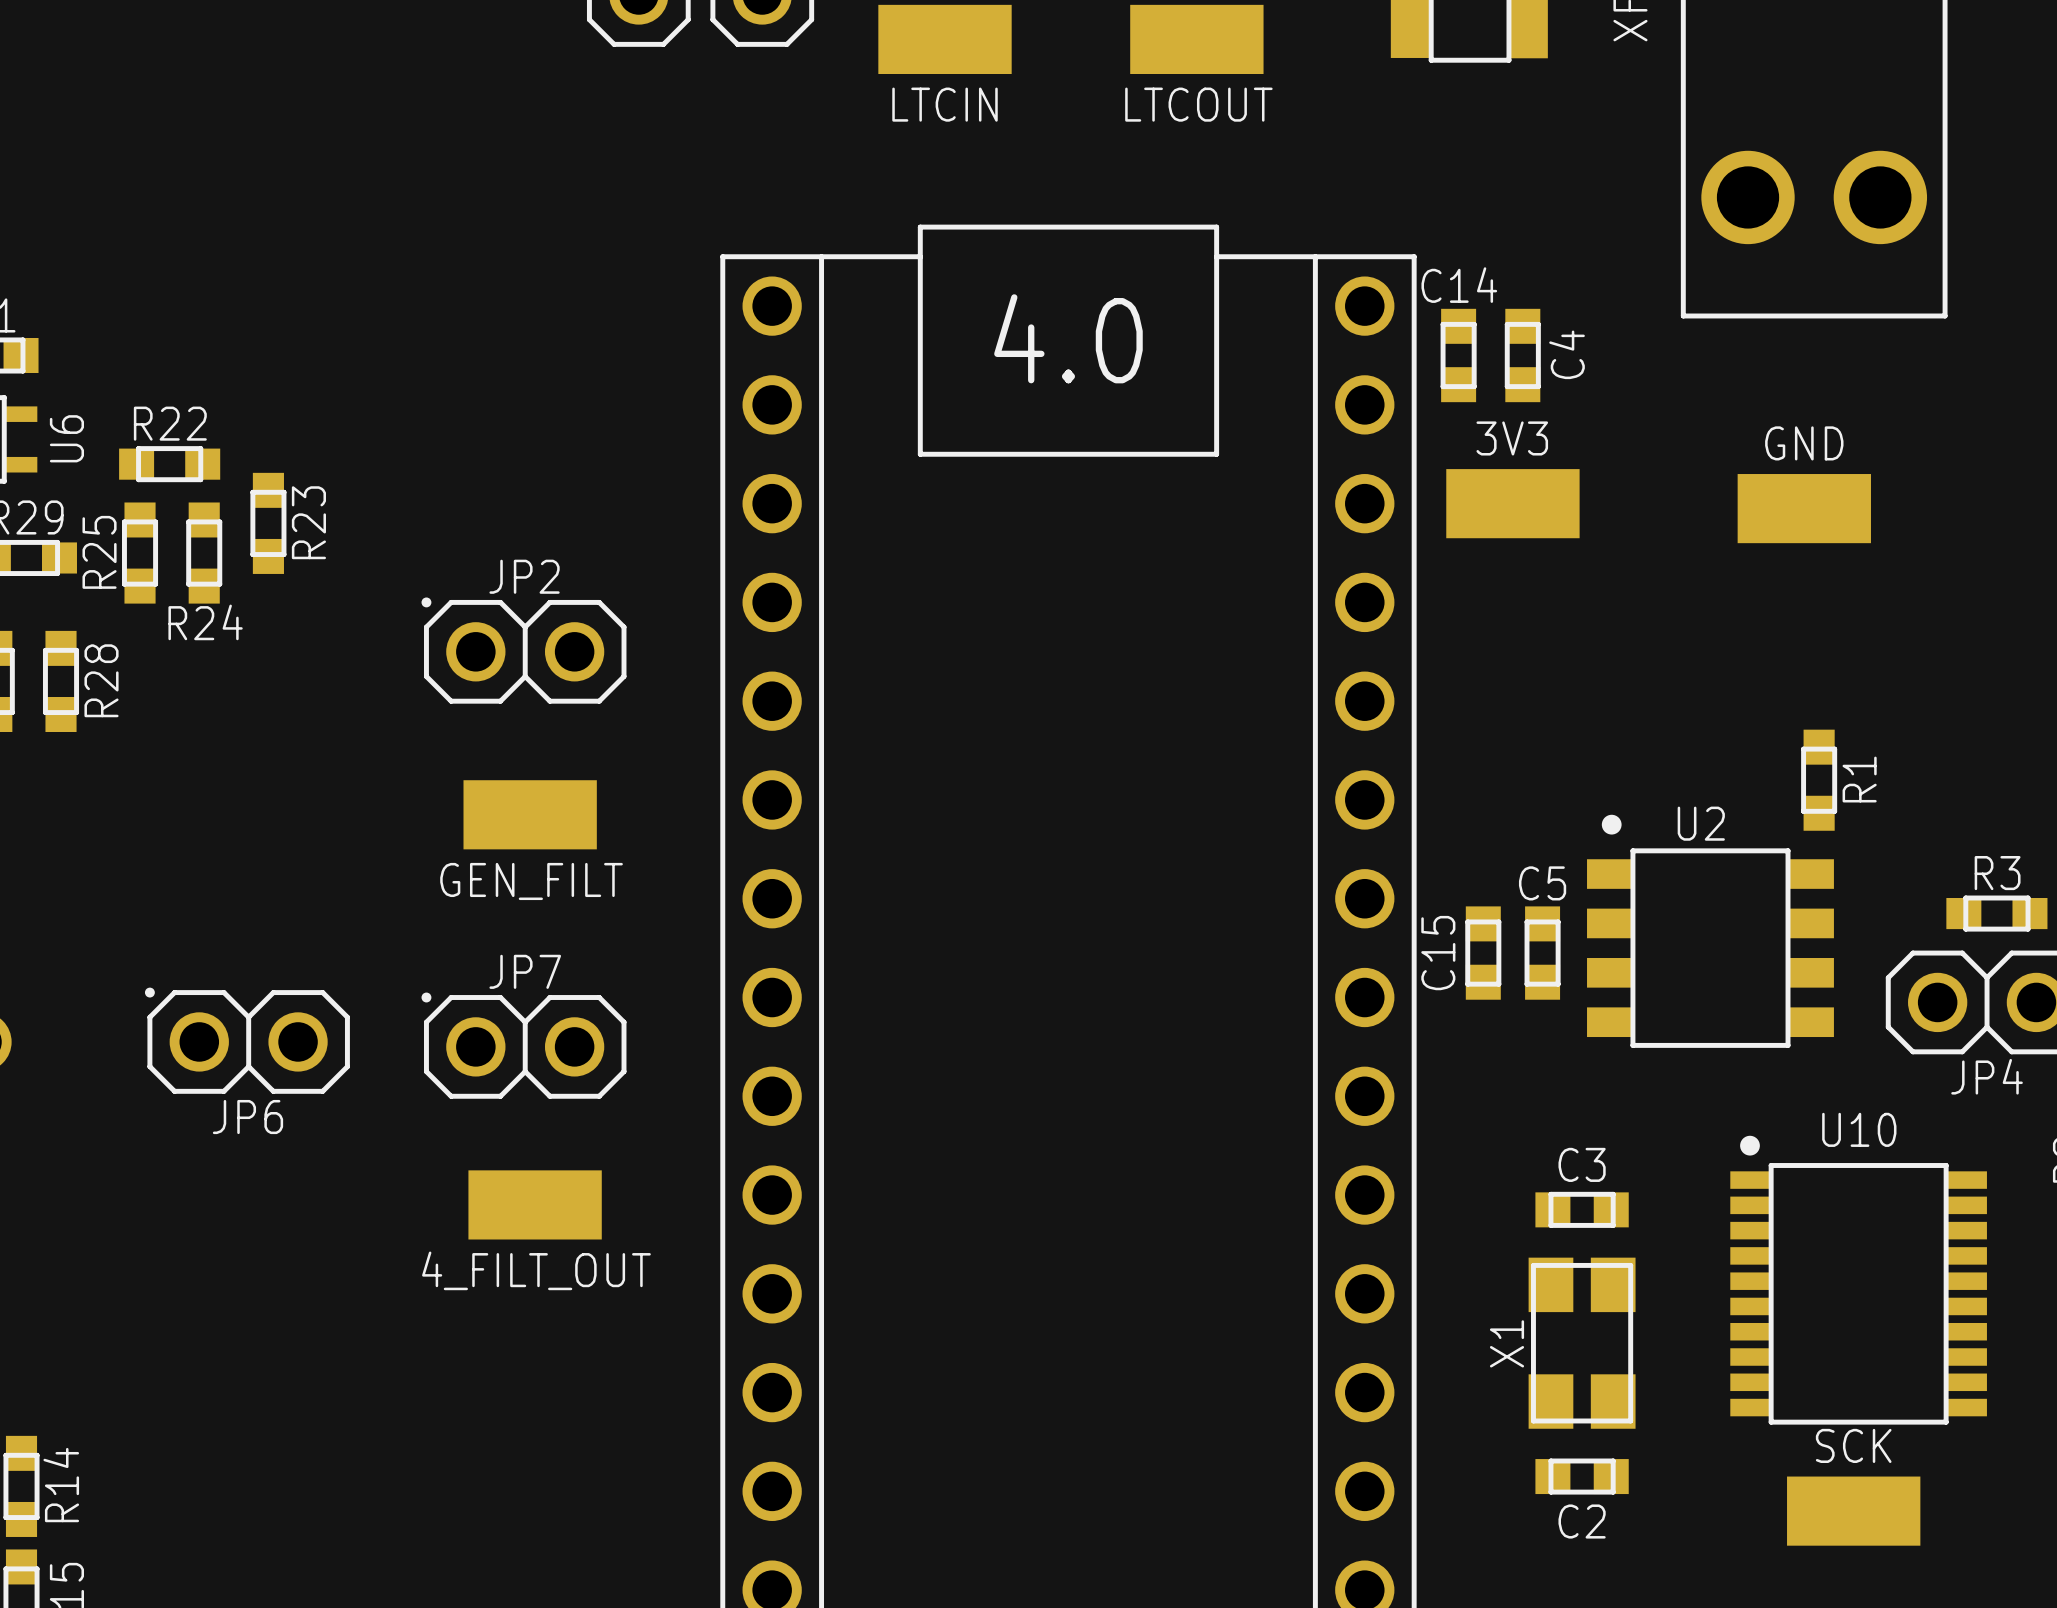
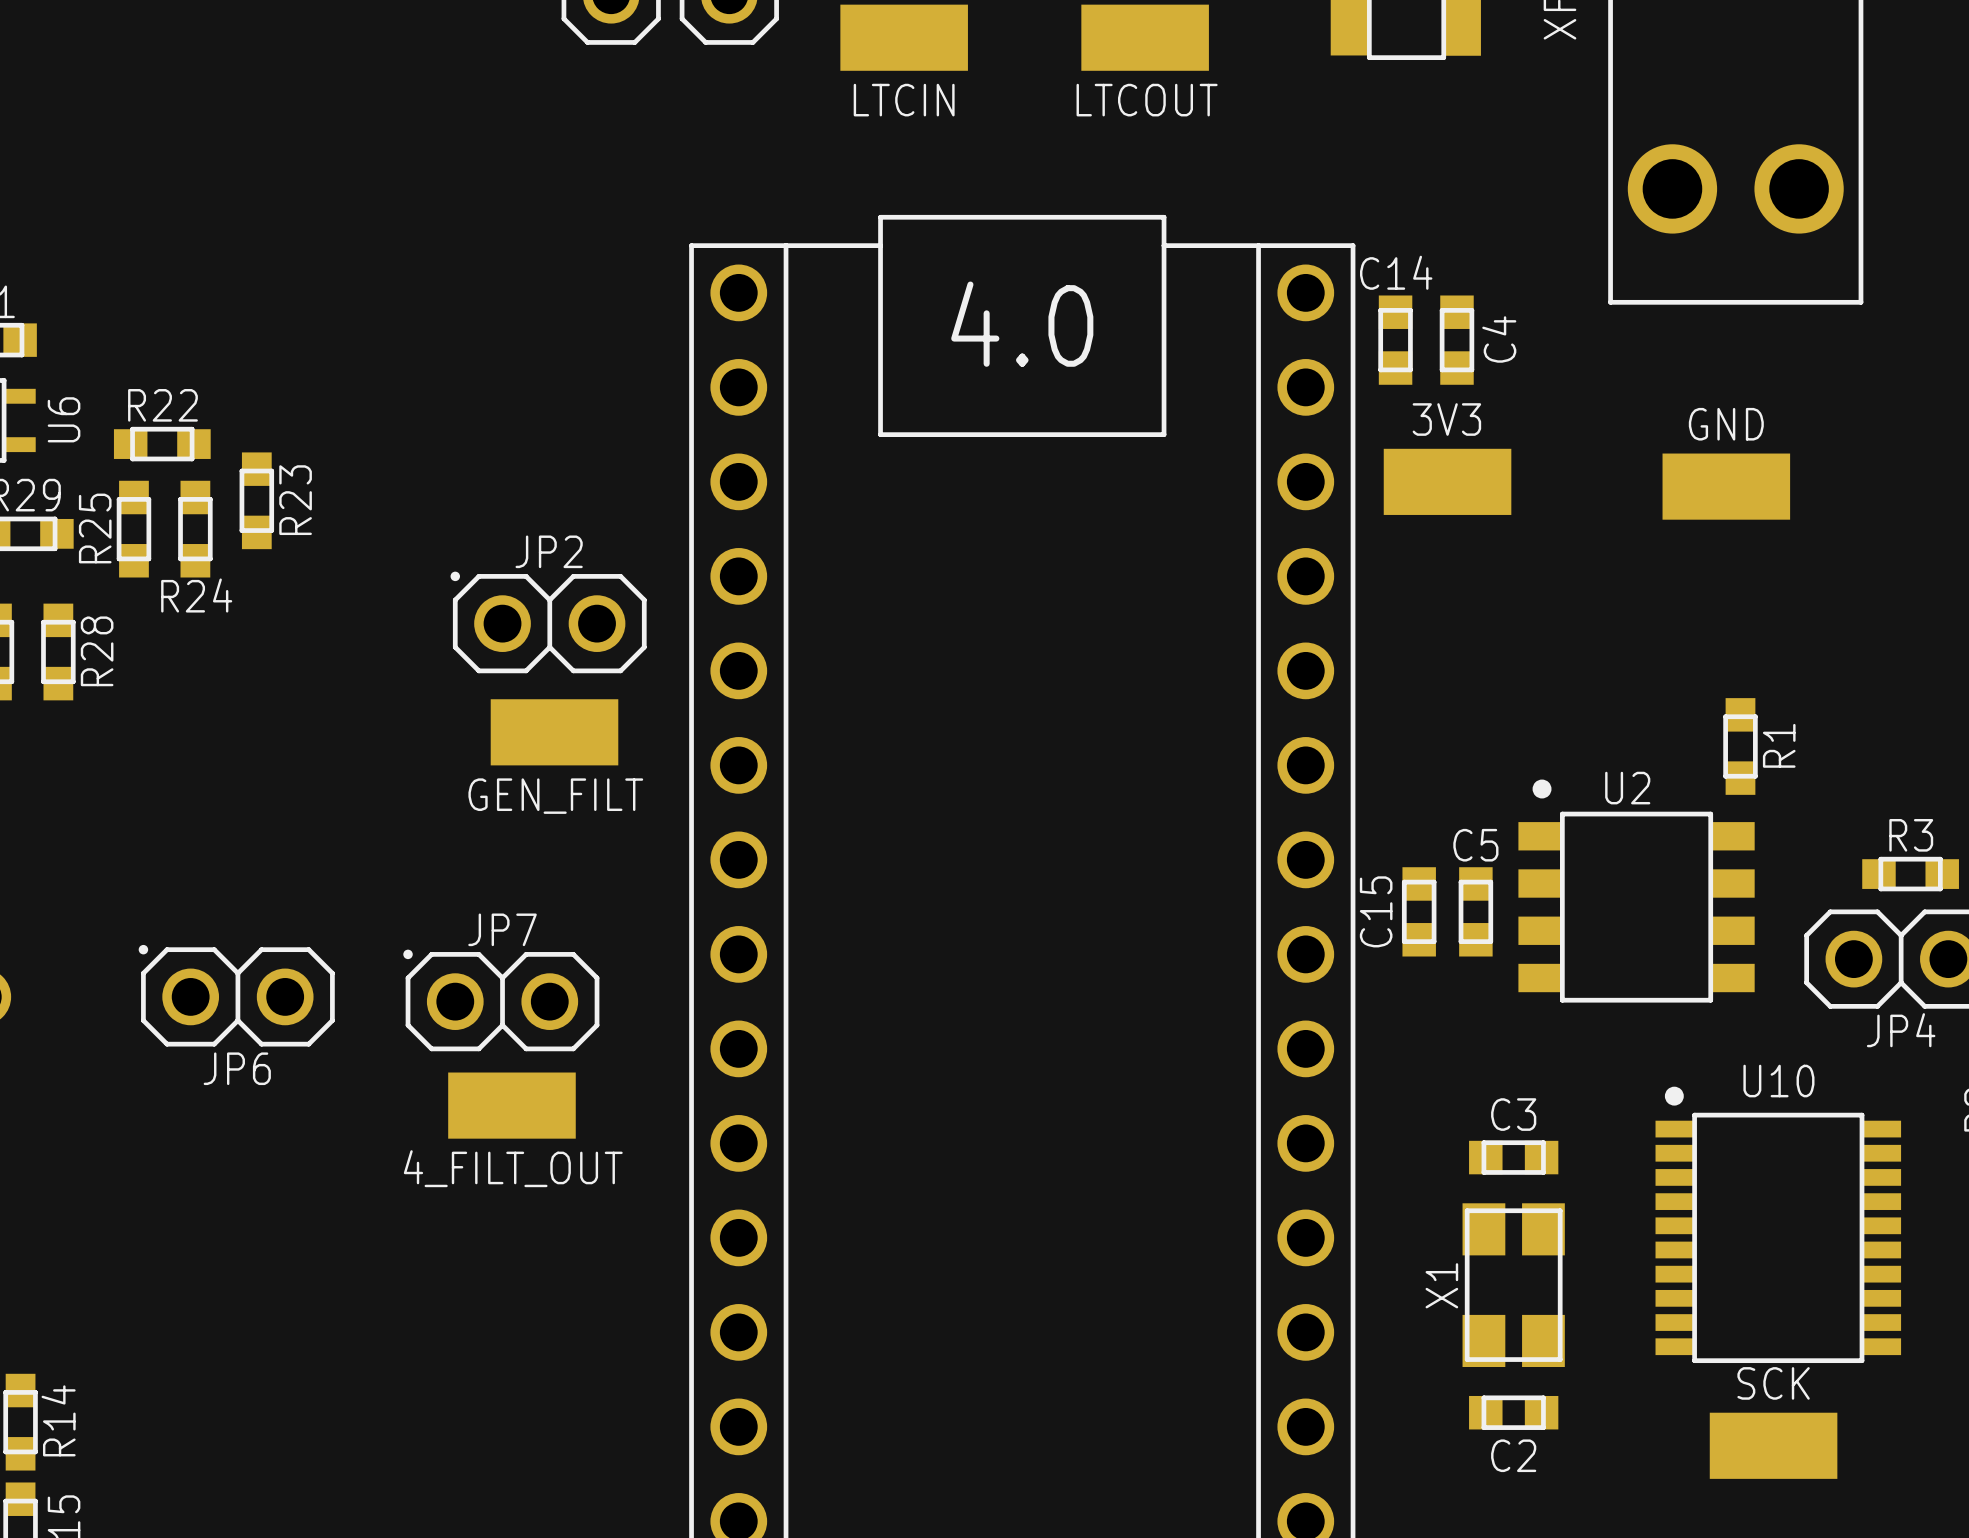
JP2 position: (523, 650) -> (548, 622)
GEN_FILT position: (530, 814) -> (554, 732)
4_FILT_OUT position: (535, 1204) -> (511, 1105)

